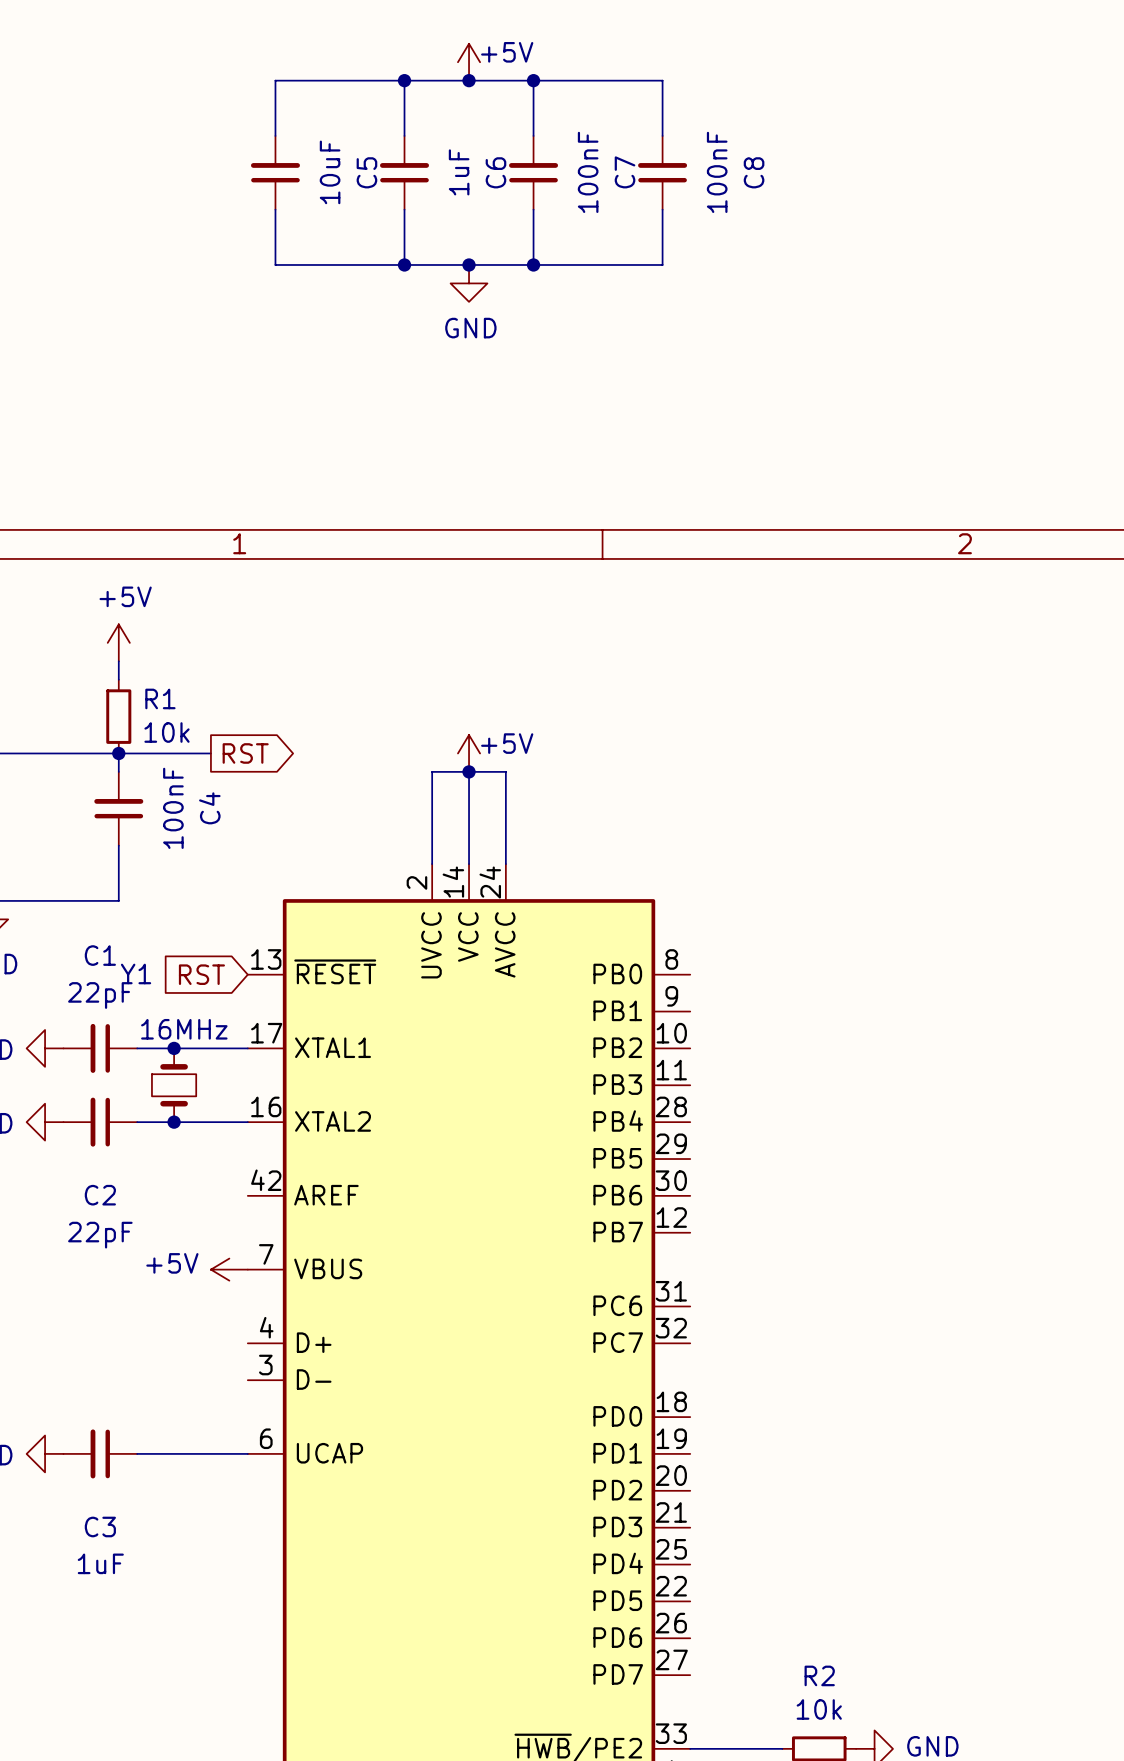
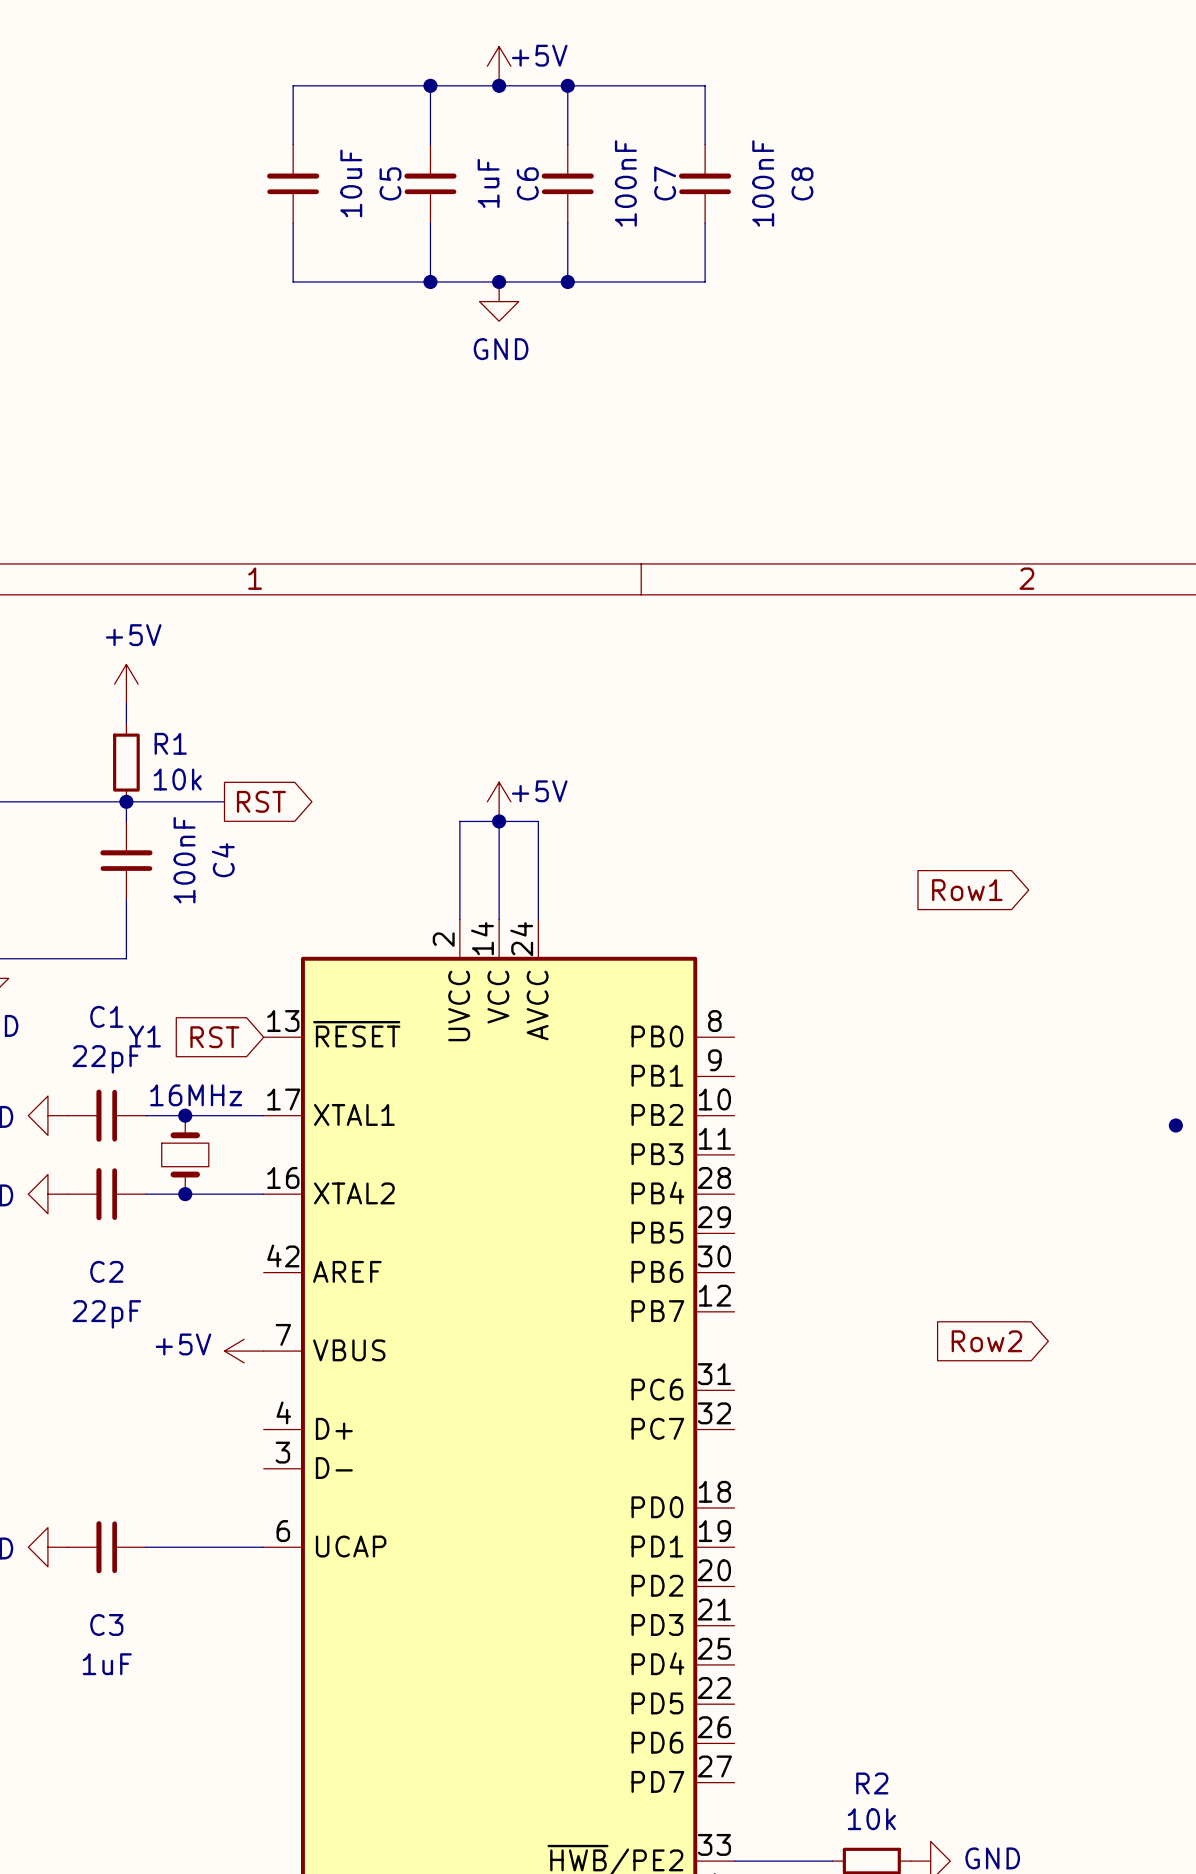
global label: none -> Row1 (967, 890)
junction: none -> (1175, 1125)
global label: none -> Row2 (986, 1341)

